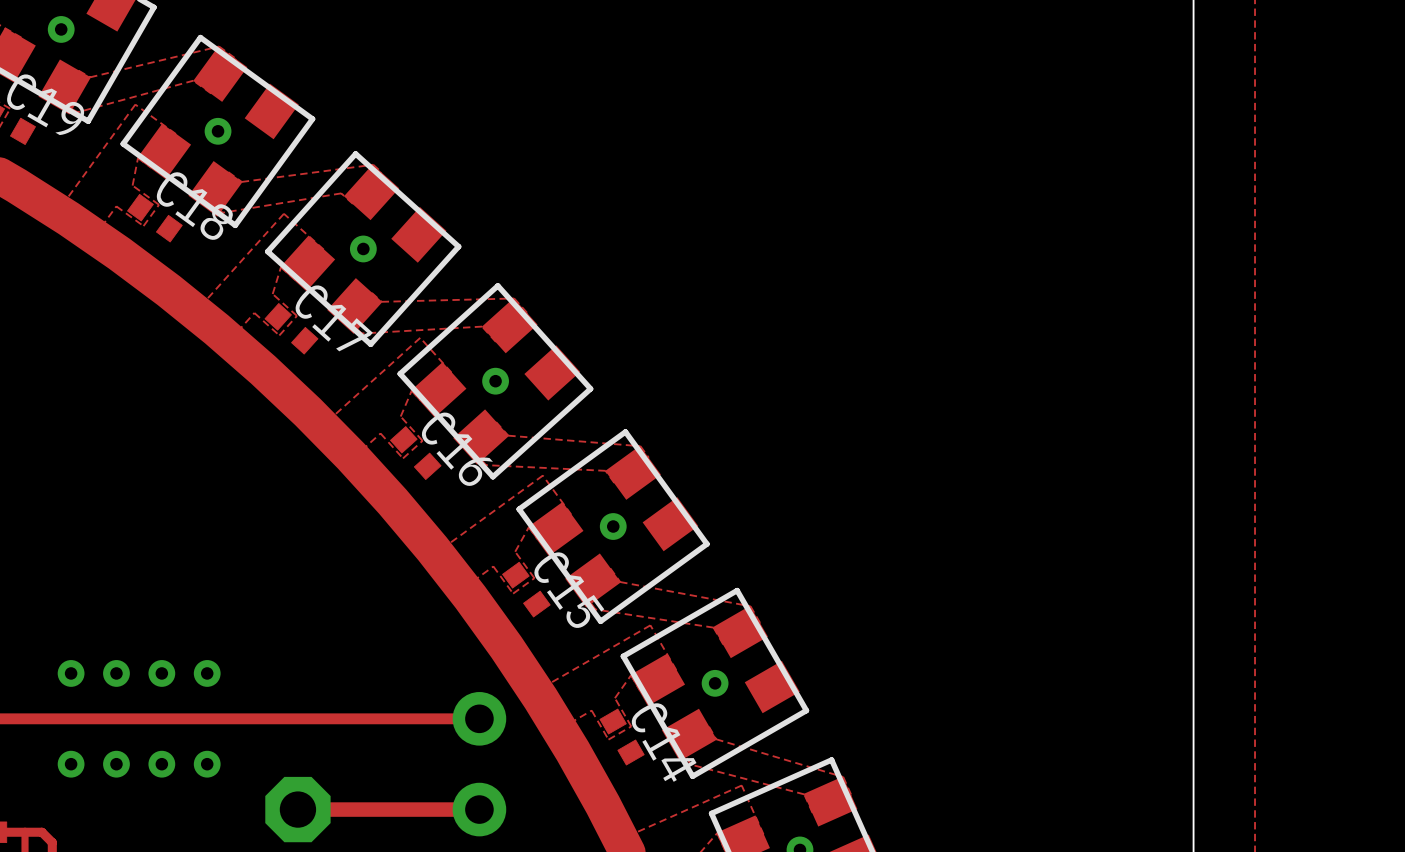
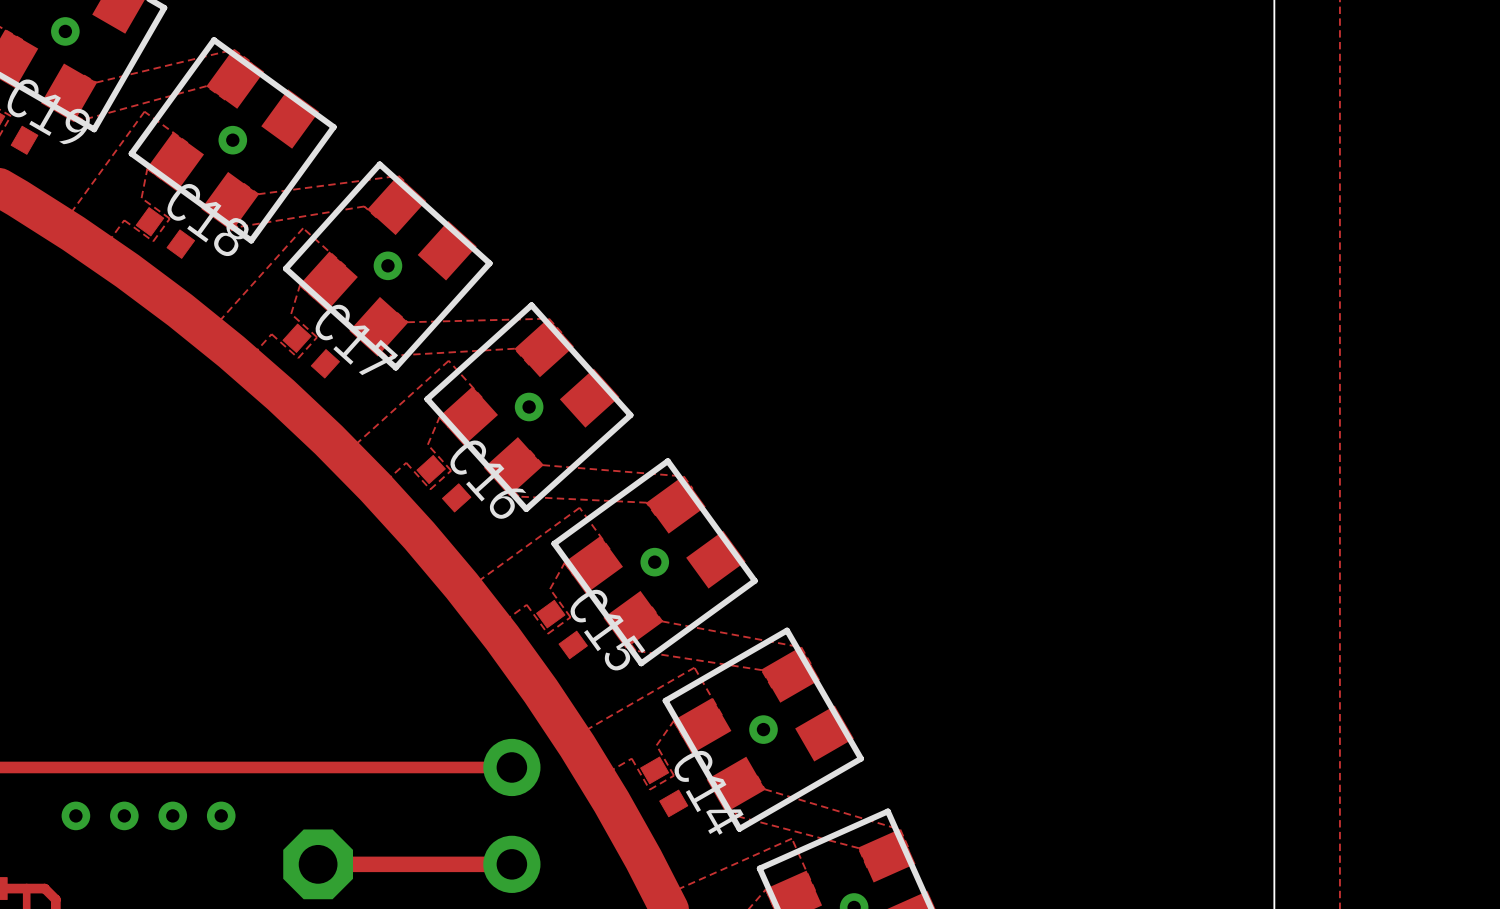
via: (71, 673) -> none
via: (116, 673) -> none
via: (161, 673) -> none
via: (207, 673) -> none

